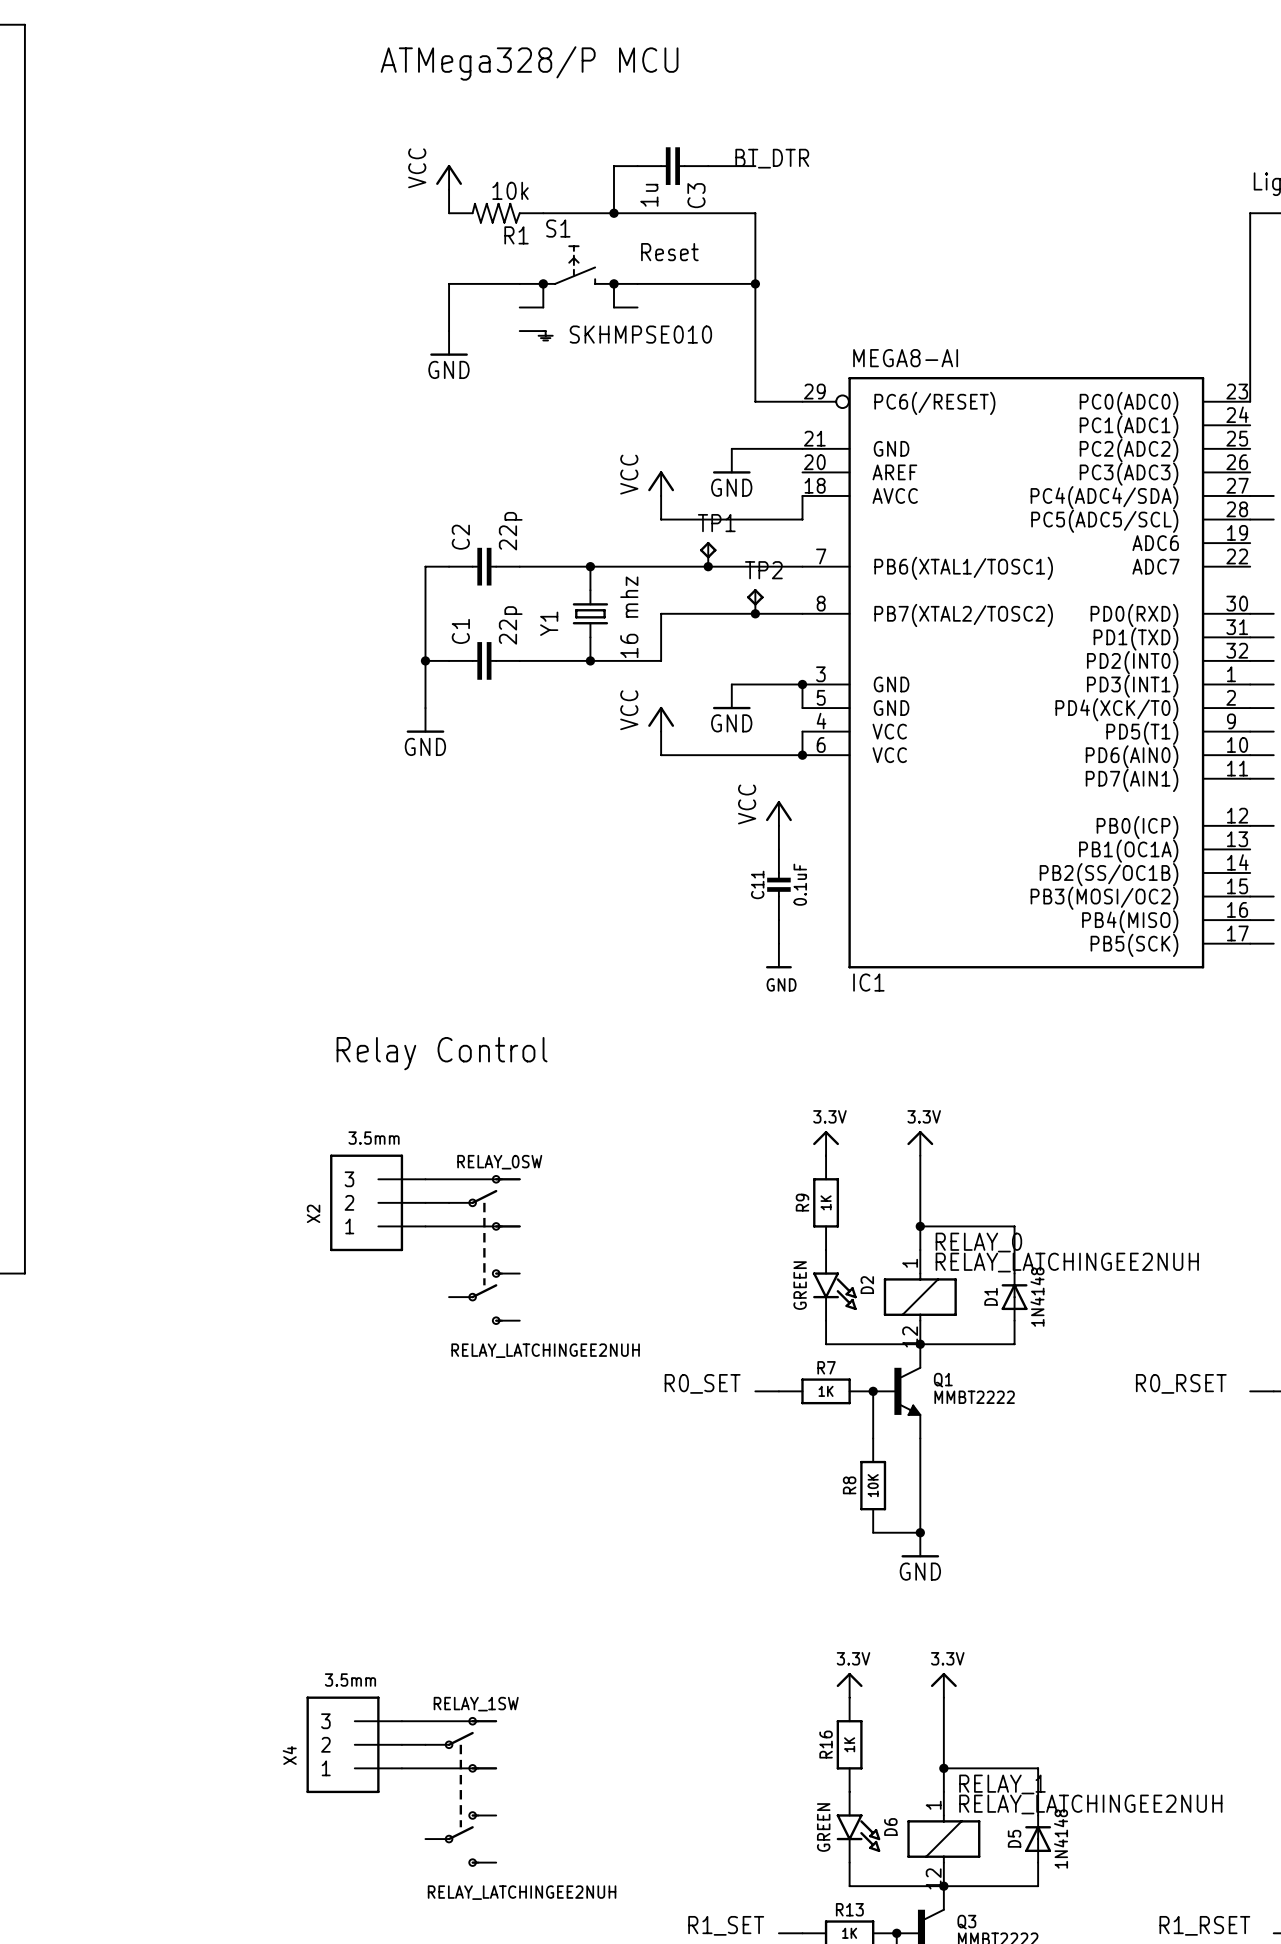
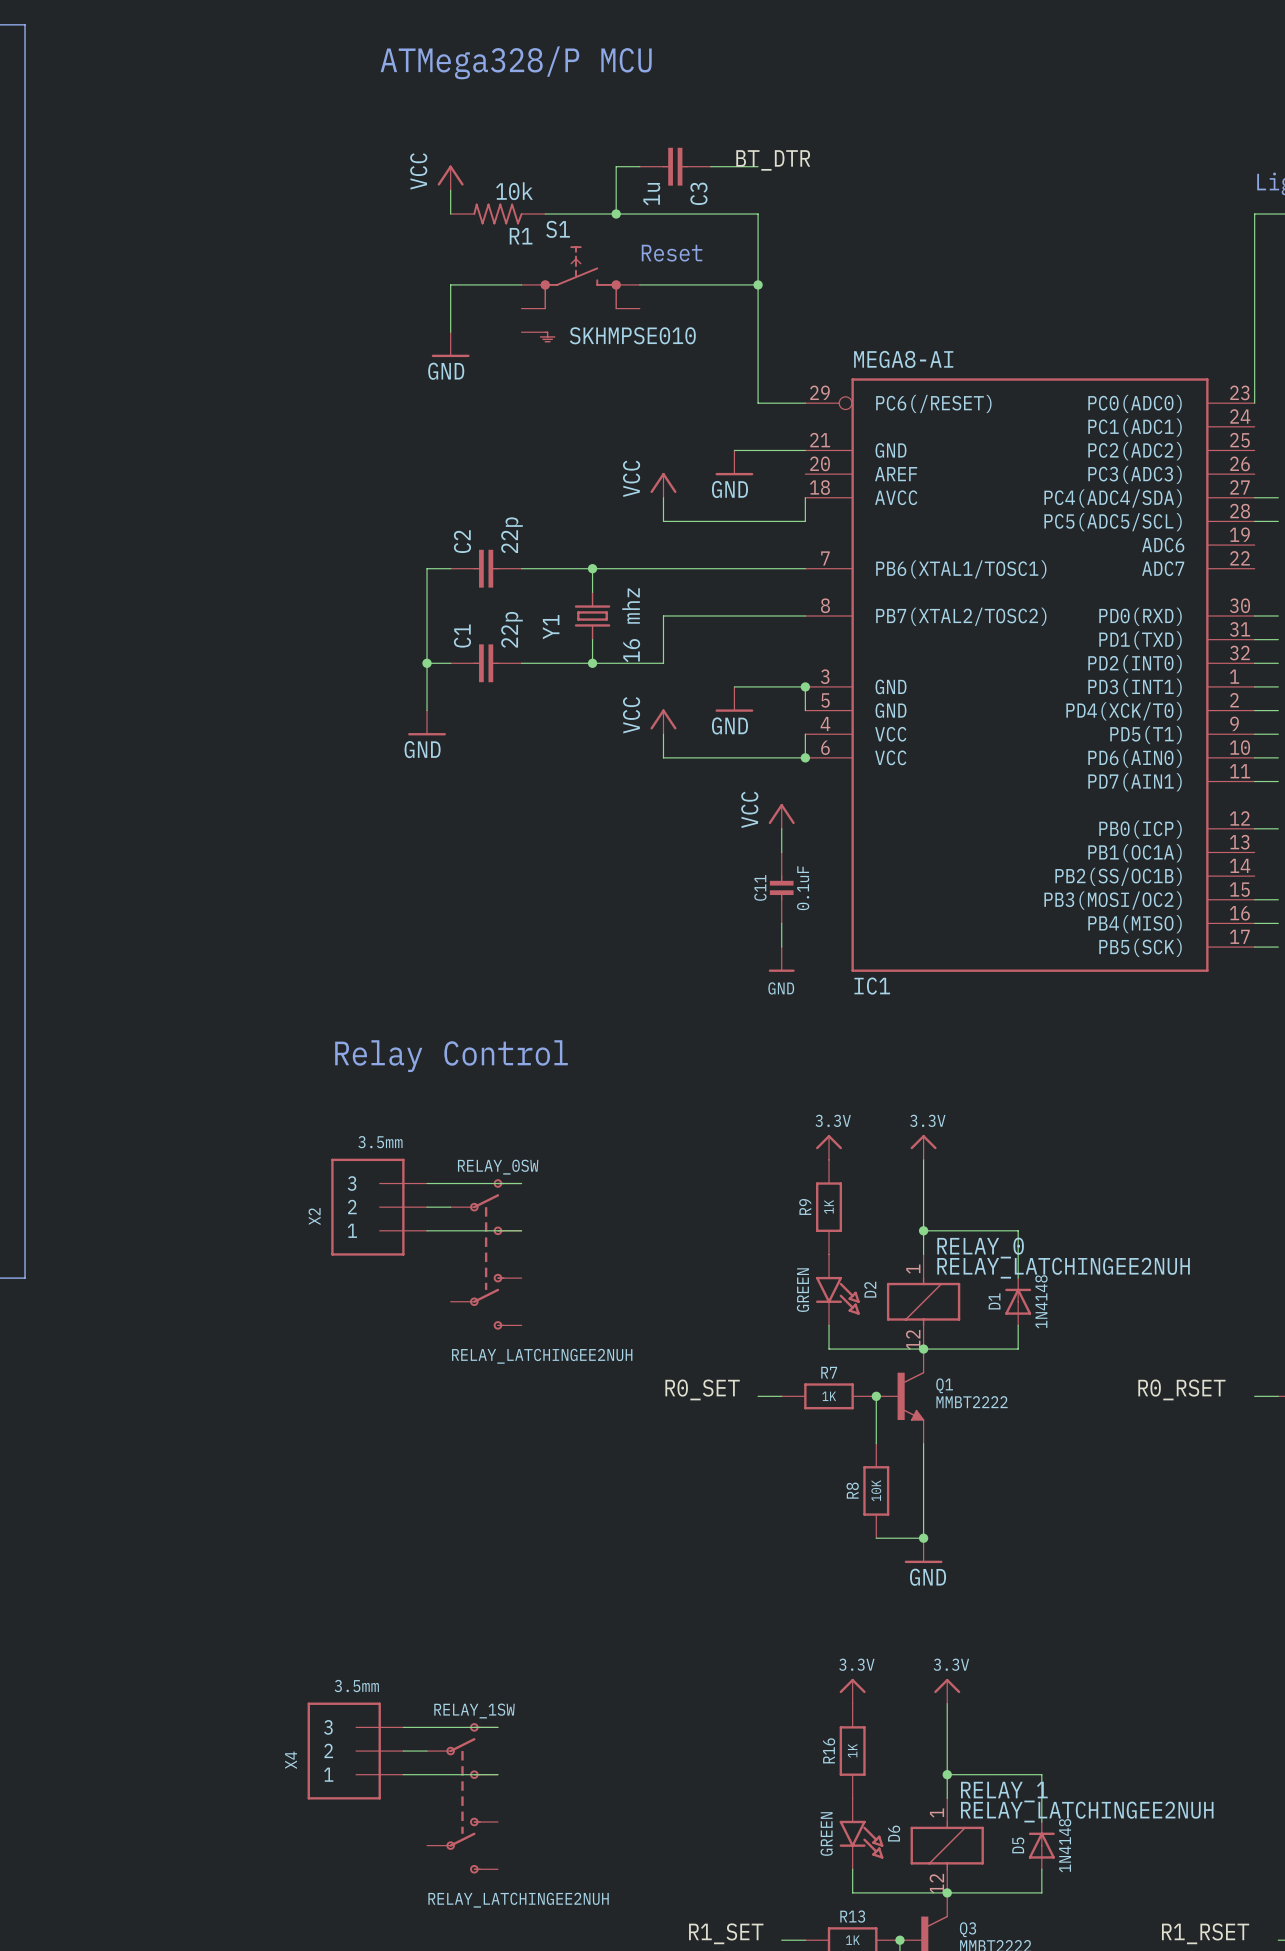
TP1: (708, 554) -> none
junction: (708, 566) -> none
TP2: (755, 601) -> none
junction: (755, 613) -> none

